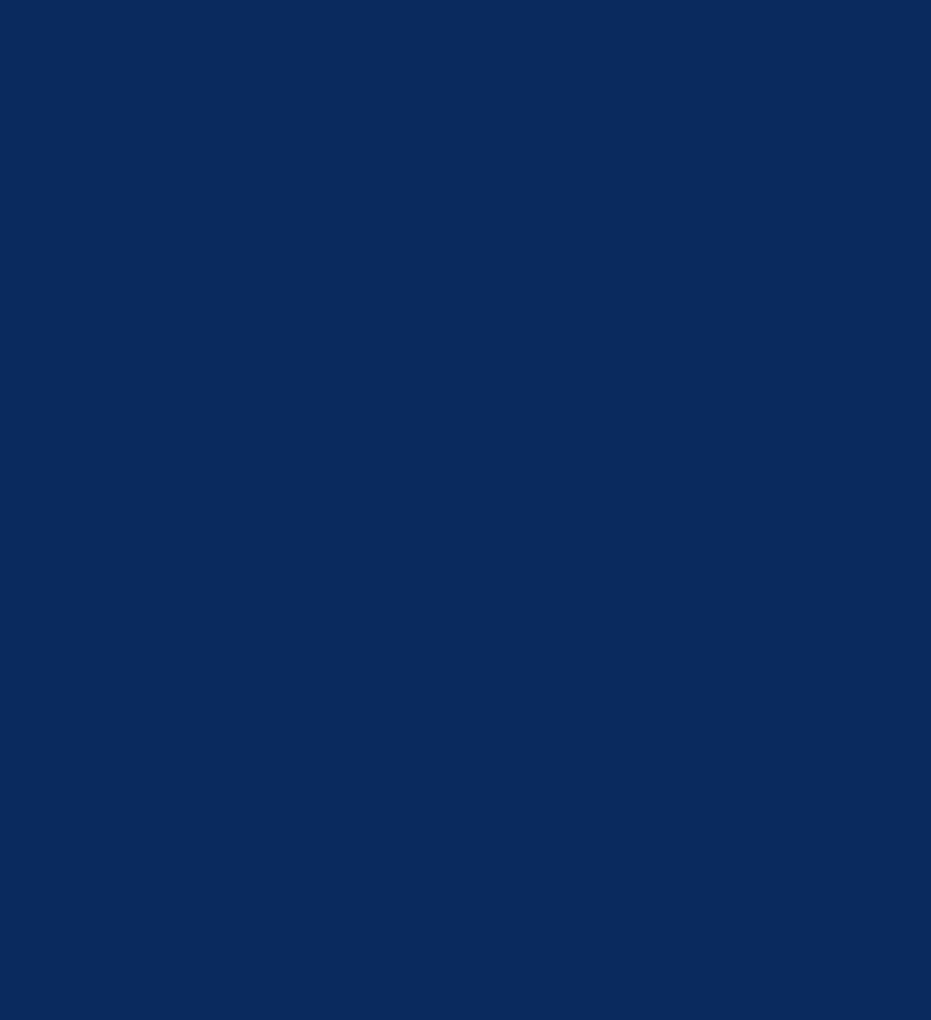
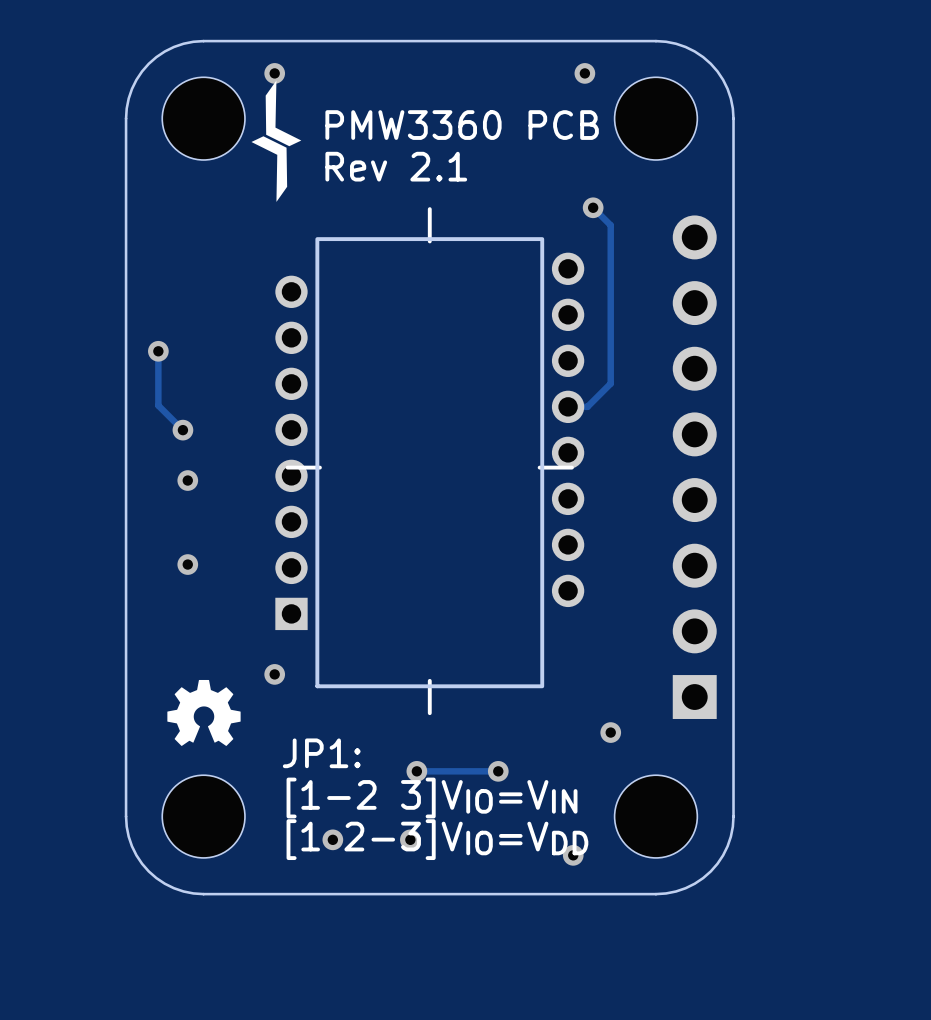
board edge: none -> (655, 41) (193, 41) (164, 51) (148, 63) (136, 79) (128, 98) (126, 118) (126, 816) (128, 836) (136, 855) (148, 871) (164, 883) (183, 891) (203, 894) (655, 894) (676, 891) (694, 883) (710, 871) (723, 855) (730, 836) (733, 816) (732, 108) (727, 88) (710, 63) (685, 47) (655, 41)
via: none -> (274, 73)
via: none -> (584, 73)
drawing: none -> [251, 80, 302, 202]
part: none -> (203, 118)
part: none -> (655, 118)
text: none -> PMW3360 PCB (462, 125)
text: none -> Rev 2.1 (396, 166)
track: none -> (593, 207) (610, 225) (610, 383) (587, 406) (568, 406)
via: none -> (593, 207)
line: none -> (429, 209) (429, 241)
track: none -> (158, 351) (158, 405) (182, 430)
via: none -> (158, 351)
via: none -> (182, 430)
part: none -> (429, 462)
line: none -> (319, 467) (287, 467)
line: none -> (571, 467) (539, 467)
part: none -> (694, 467)
via: none -> (187, 480)
via: none -> (187, 564)
via: none -> (274, 674)
drawing: none -> [167, 679, 241, 746]
line: none -> (429, 680) (429, 713)
via: none -> (610, 732)
text: none -> JP1: (321, 753)
via: none -> (416, 771)
track: none -> (498, 771) (416, 771)
via: none -> (498, 771)
text: none -> [1-2 3]VIO=VIN (432, 798)
part: none -> (203, 816)
part: none -> (655, 816)
via: none -> (332, 839)
via: none -> (410, 839)
text: none -> [1 2-3]VIO=VDD (437, 839)
via: none -> (573, 855)

